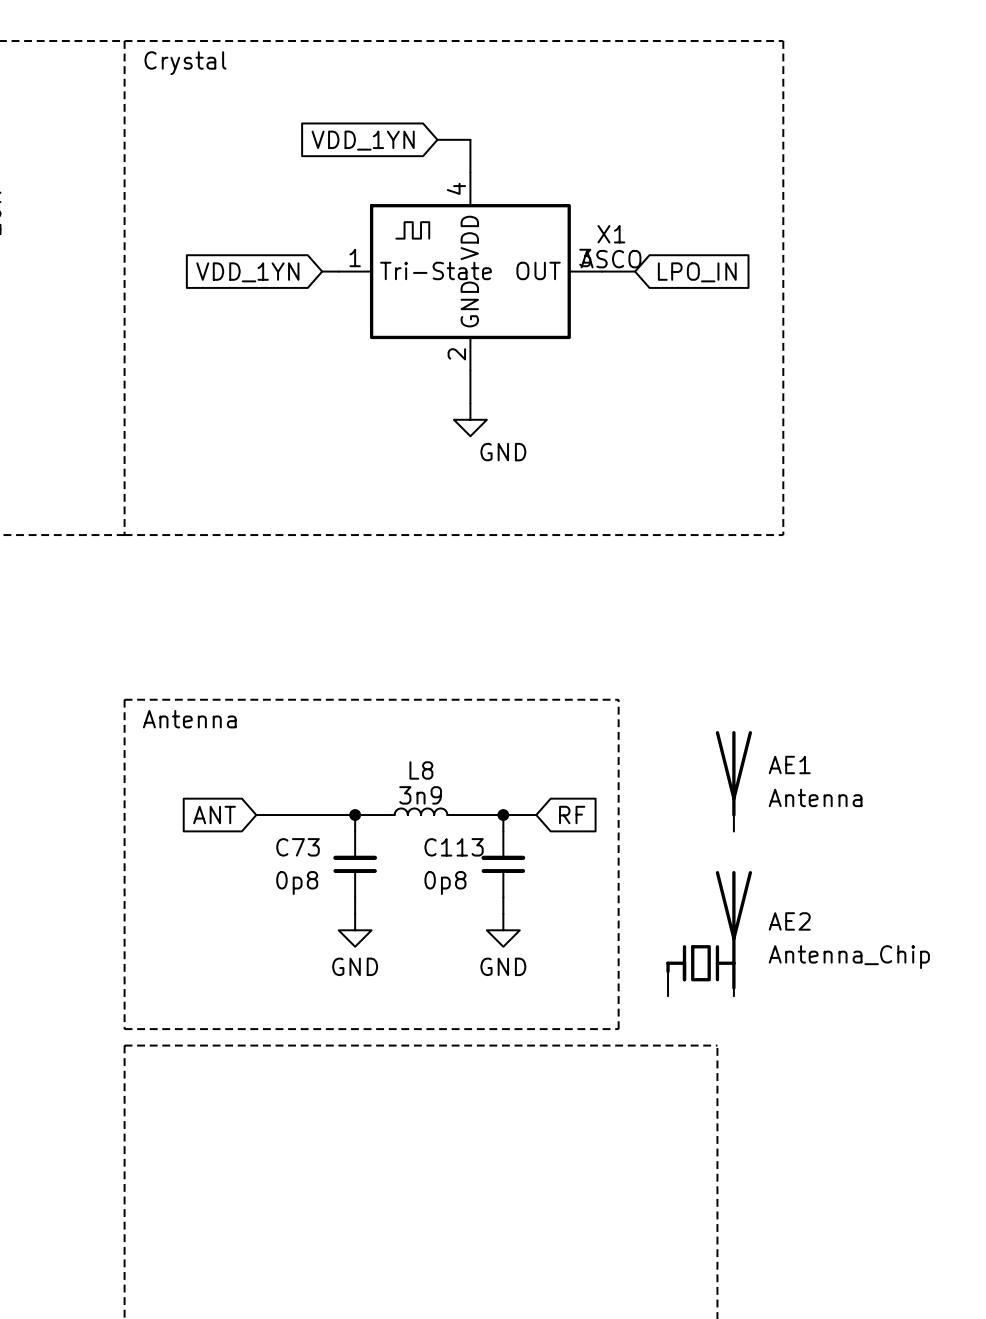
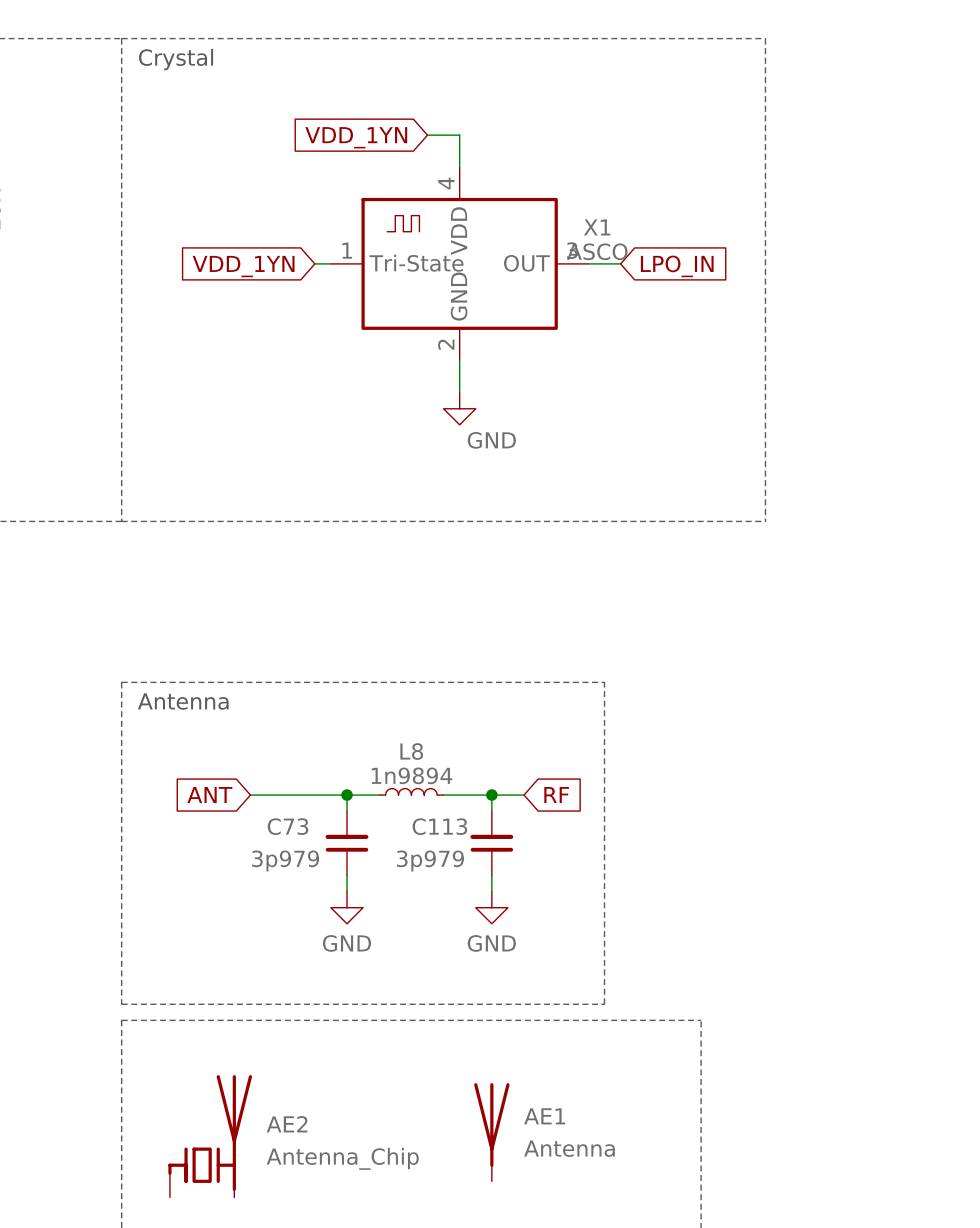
AE1 position: (733, 781) -> (491, 1132)
L8 value: 3n9 (420, 795) -> 1n9894 (411, 775)
C73 value: 0p8 (297, 883) -> 3p979 (285, 860)
C113 value: 0p8 (445, 883) -> 3p979 (430, 860)
AE2 position: (709, 933) -> (210, 1136)

